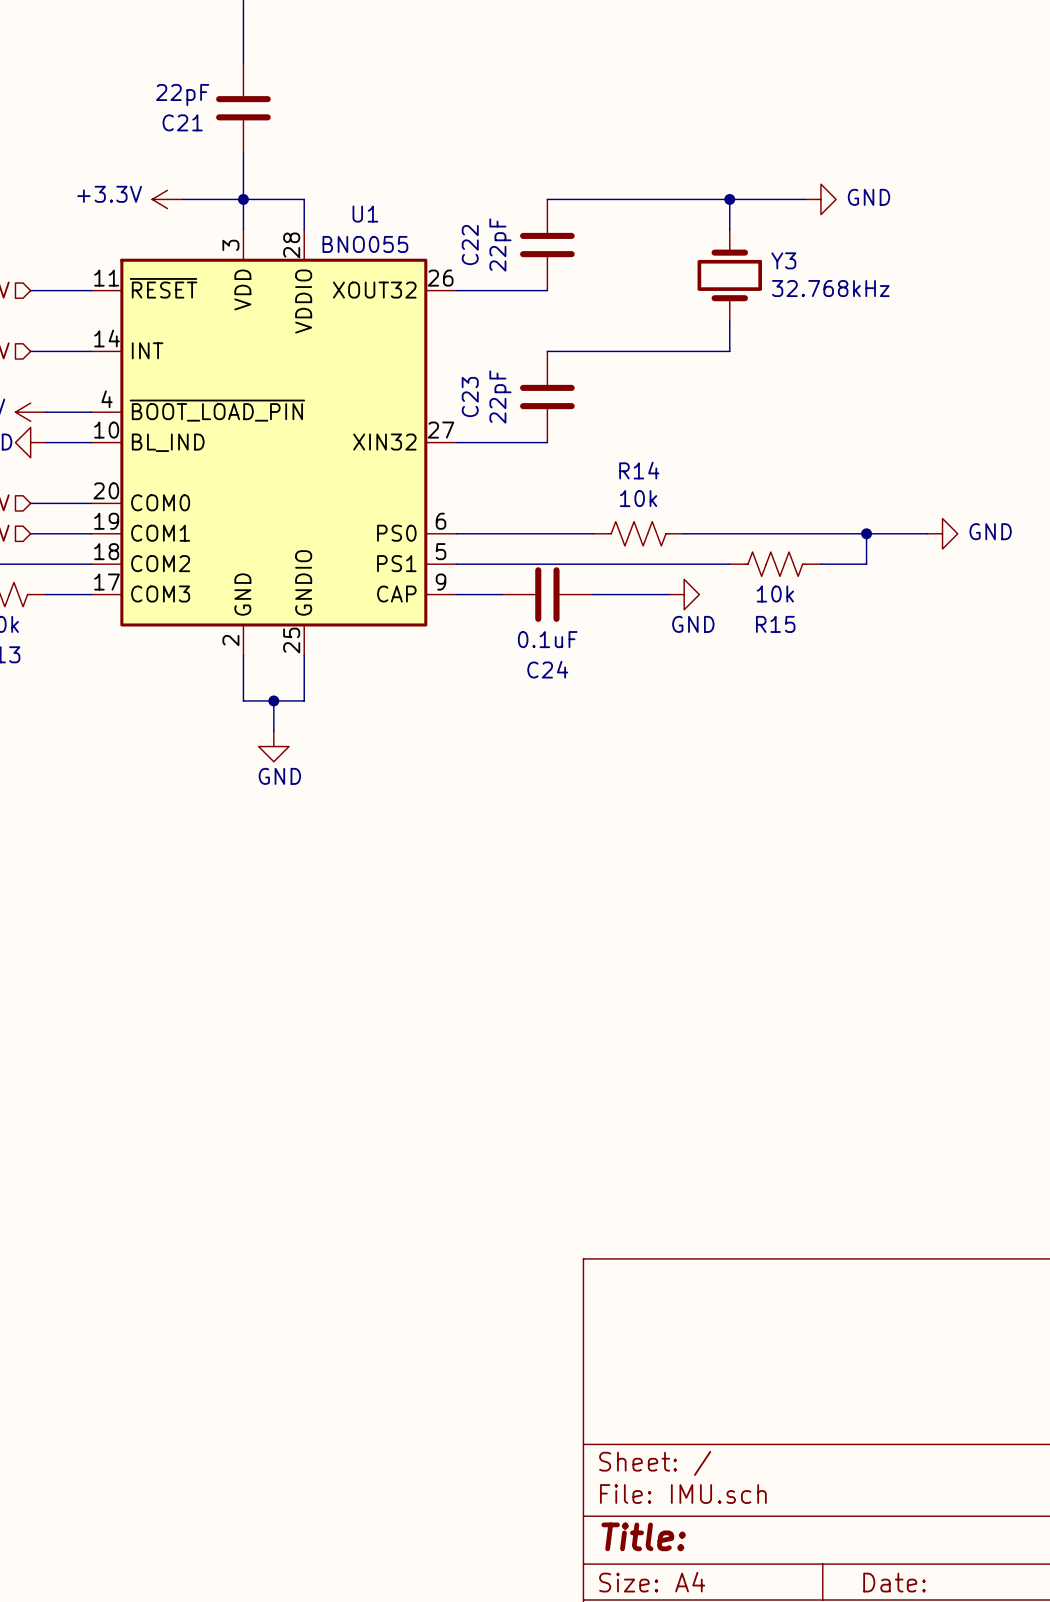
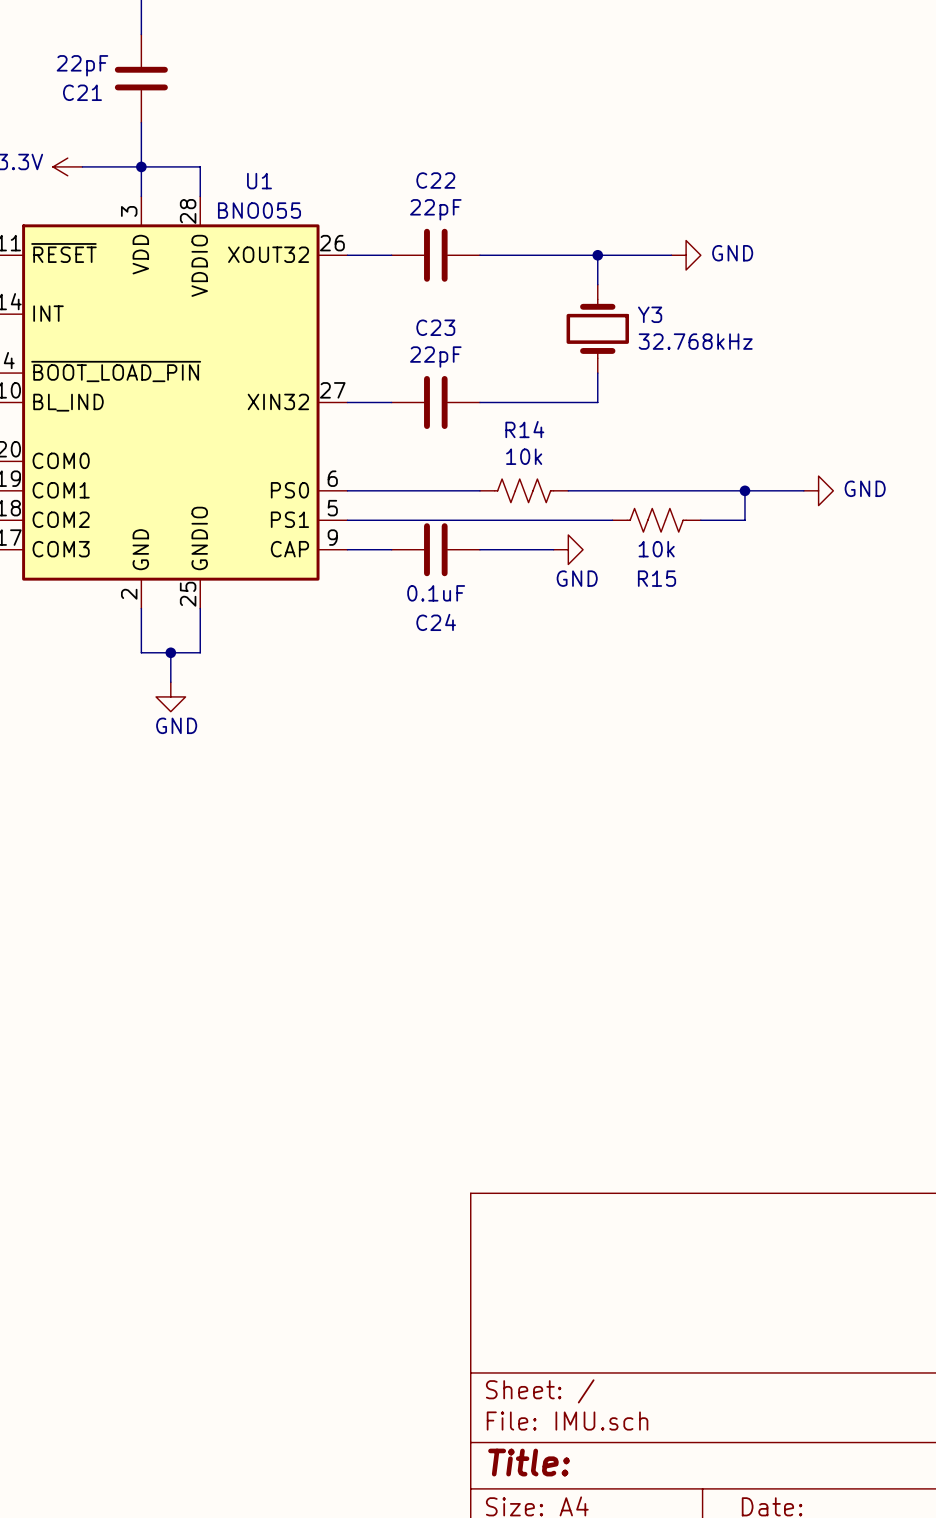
wire: (547, 199) (805, 199) -> none
wire: (729, 199) (729, 229) -> (597, 255) (597, 284)
junction: (729, 199) -> none
power symbol position: GND (820, 199) -> GND (686, 255)
C22 rotation: 0° (547, 245) -> 90° clockwise (435, 255)
Y3 position: (729, 275) -> (597, 328)
wire: none -> (479, 255) (671, 255)
junction: none -> (597, 255)
wire: (729, 321) (729, 351) (547, 351) -> none
C23 rotation: 0° (547, 397) -> 90° clockwise (435, 402)
wire: none -> (597, 373) (597, 402) (479, 402)

